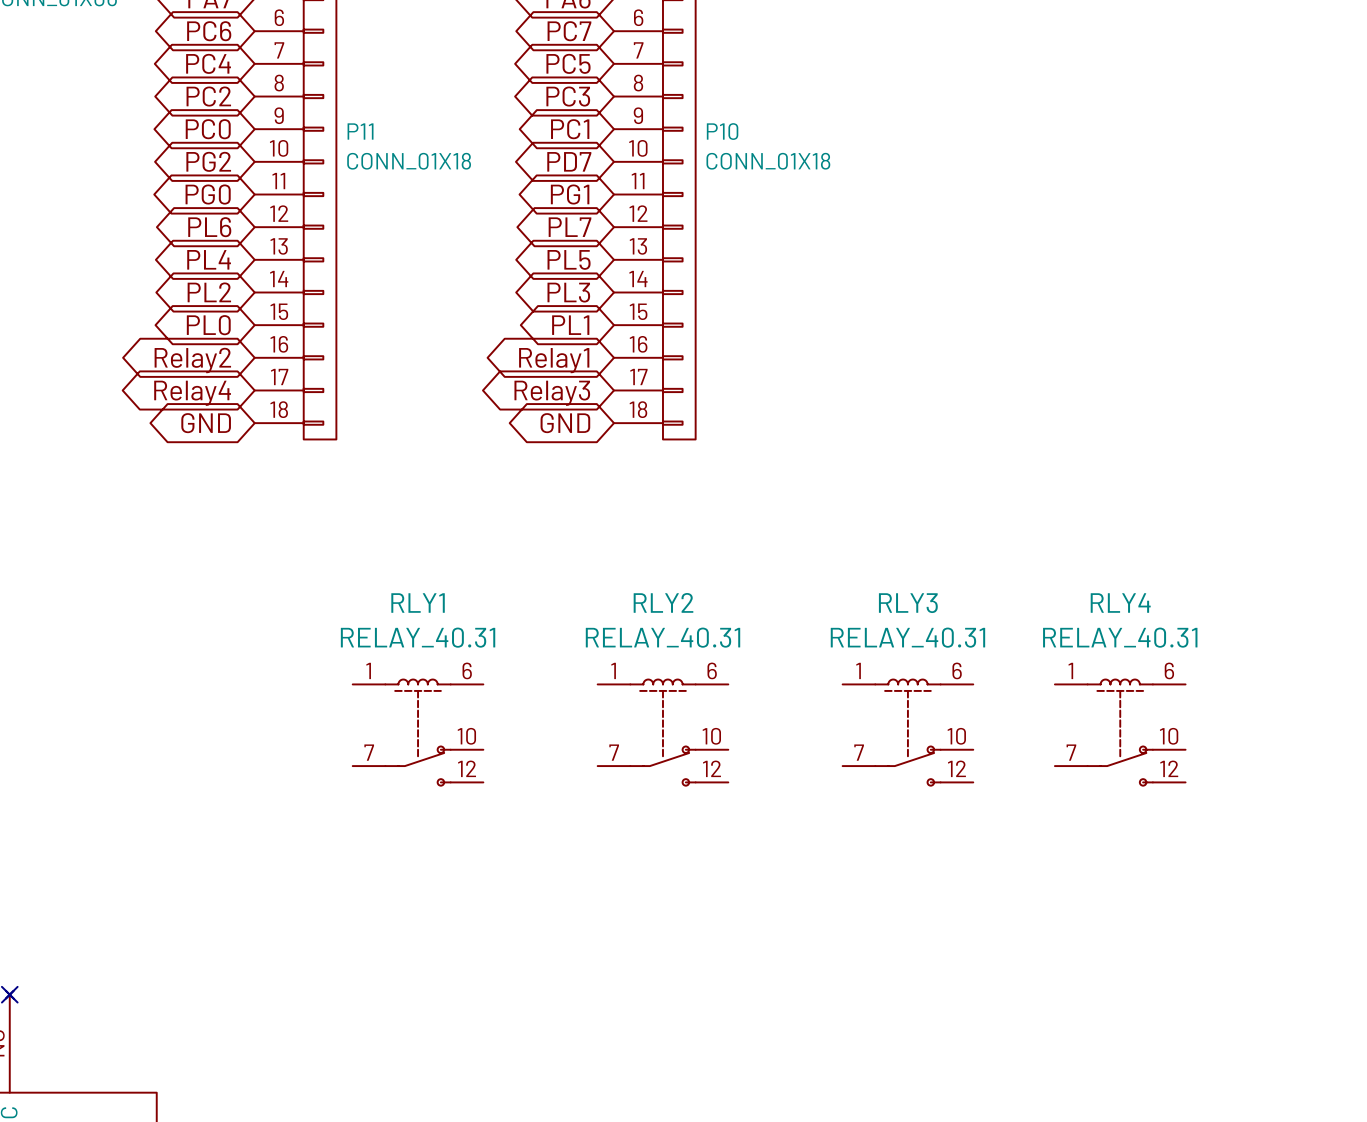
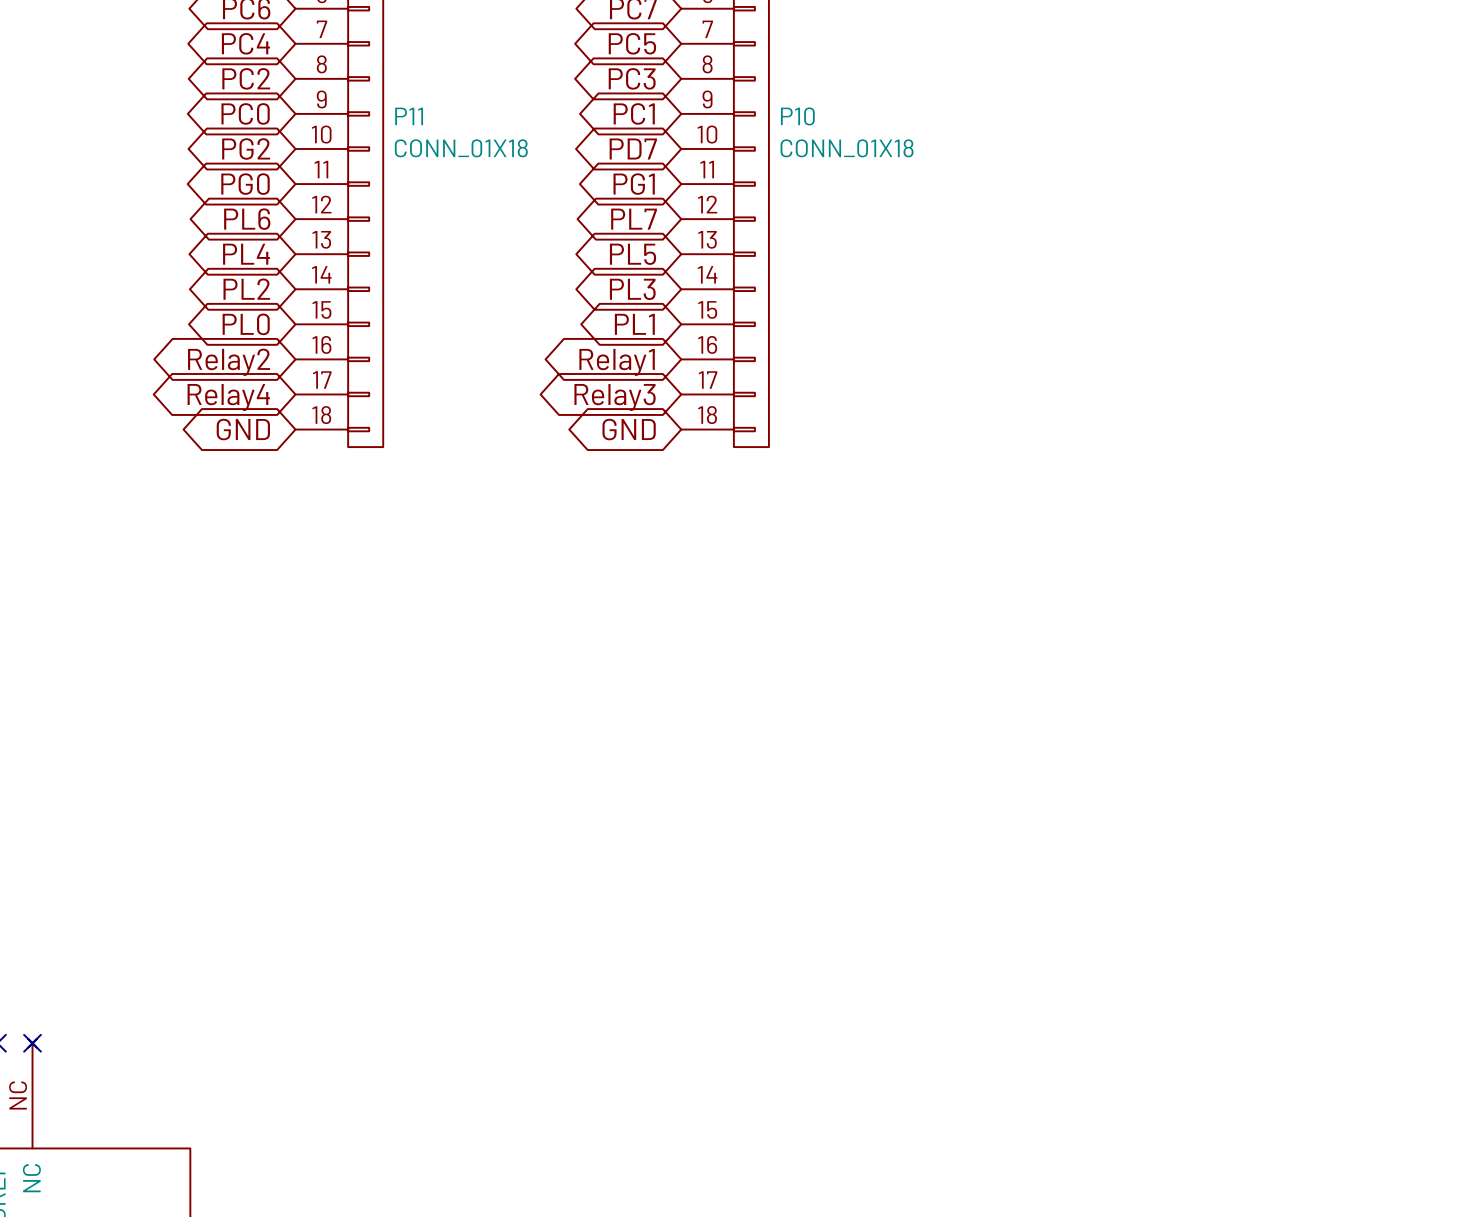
RLY1: RELAY_40.31 (418, 732) -> none
RLY2: RELAY_40.31 (662, 732) -> none
RLY3: RELAY_40.31 (907, 732) -> none
RLY4: RELAY_40.31 (1120, 732) -> none

